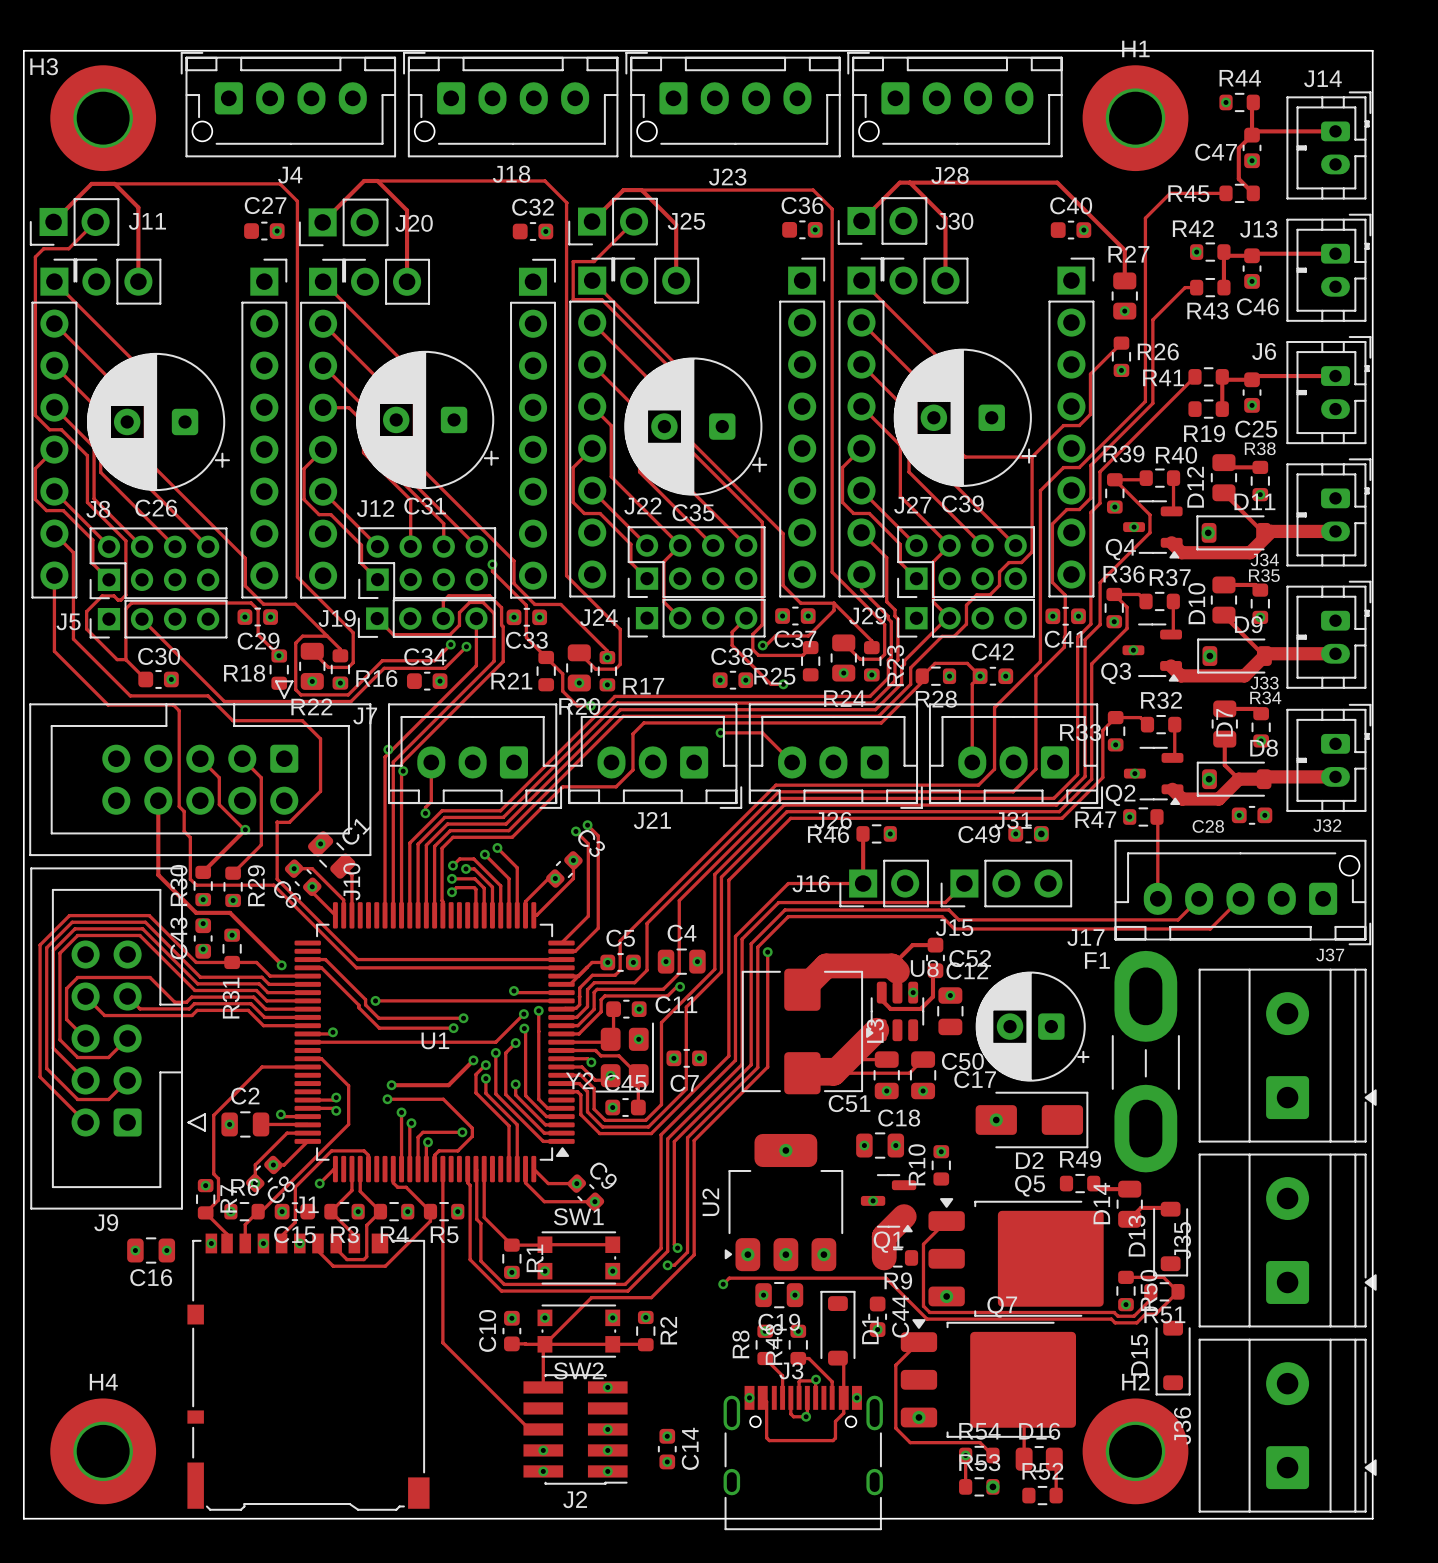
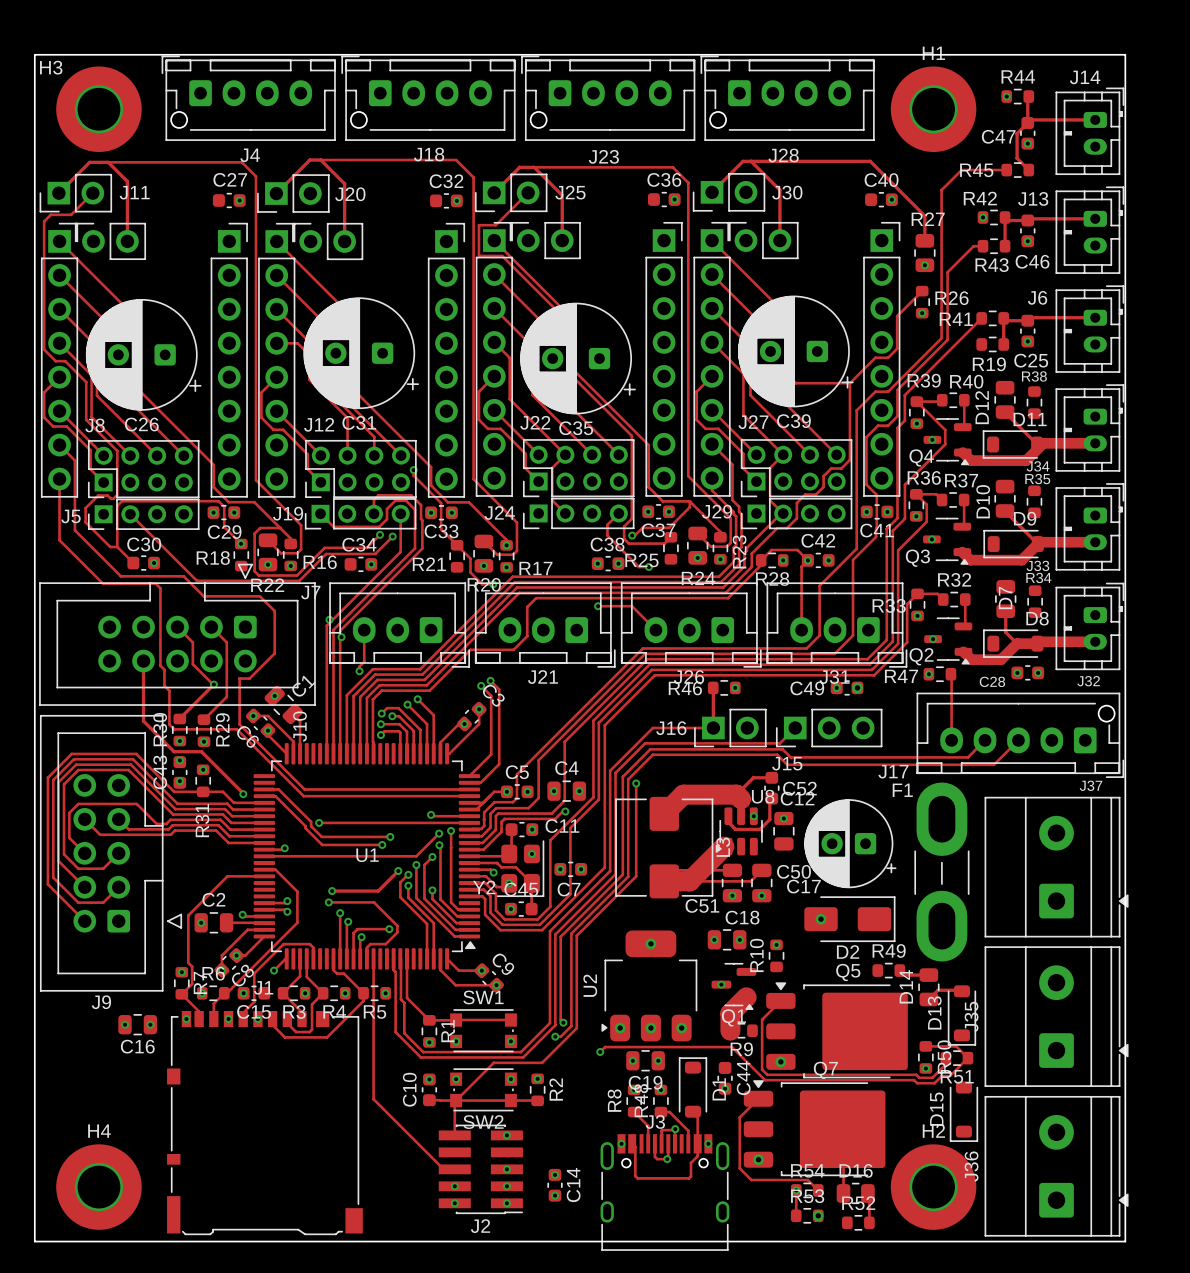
track: (1223, 462) (1228, 467) (1260, 467) -> none
via: (1260, 494) -> none
via: (1208, 532) -> none
track: (1223, 584) (1255, 584) (1260, 590) -> none
via: (1260, 617) -> none
via: (1209, 656) -> none
track: (1224, 708) (1256, 708) (1261, 713) -> none
via: (1261, 740) -> none
via: (1209, 779) -> none

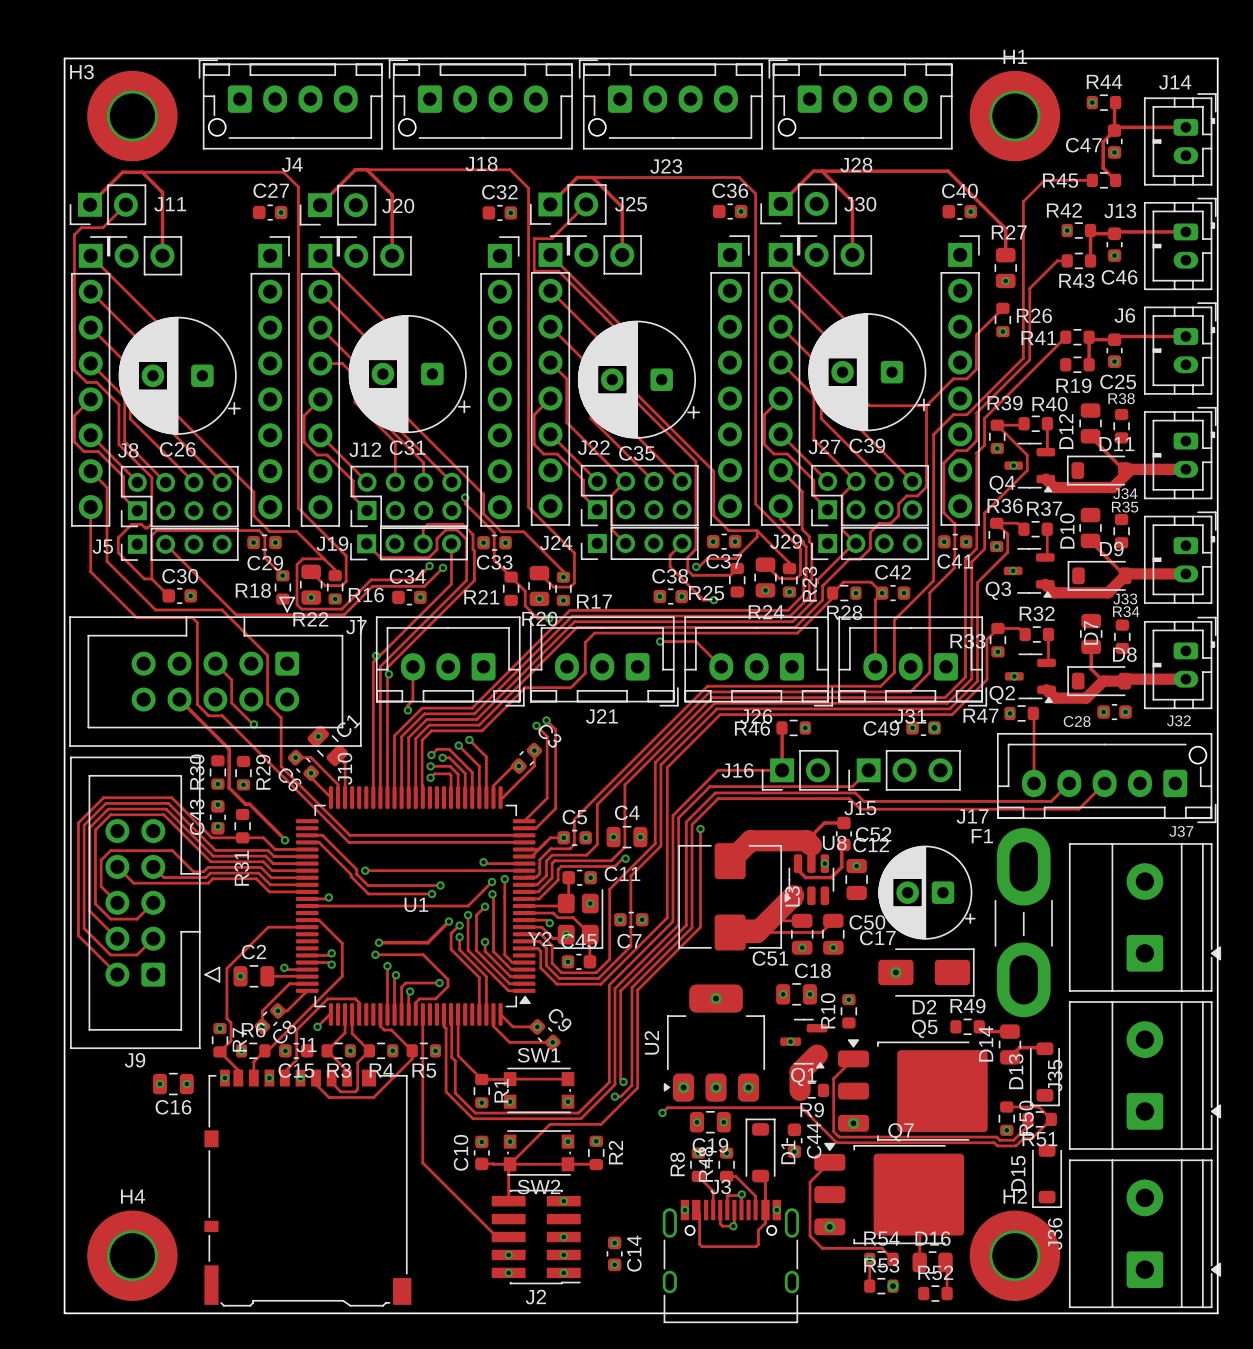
track: (203, 596) (260, 596) (274, 611) (274, 653) (249, 678) (239, 678) -> none
track: (211, 627) (226, 642) -> (243, 631) (267, 655) (267, 679)
track: (143, 661) (143, 721) (174, 751) (201, 751) (209, 760) -> (179, 699) (229, 749) (229, 787) (245, 804) (249, 804)
track: (226, 665) (226, 696) (204, 719) -> (267, 704) (281, 717)
track: (164, 669) (164, 685) (169, 690) (169, 724) (174, 729) (236, 729) -> (222, 715) (278, 771)
track: none -> (201, 708) (208, 715) (222, 715)
track: (213, 684) (179, 718) -> none
via: (203, 769) -> none

